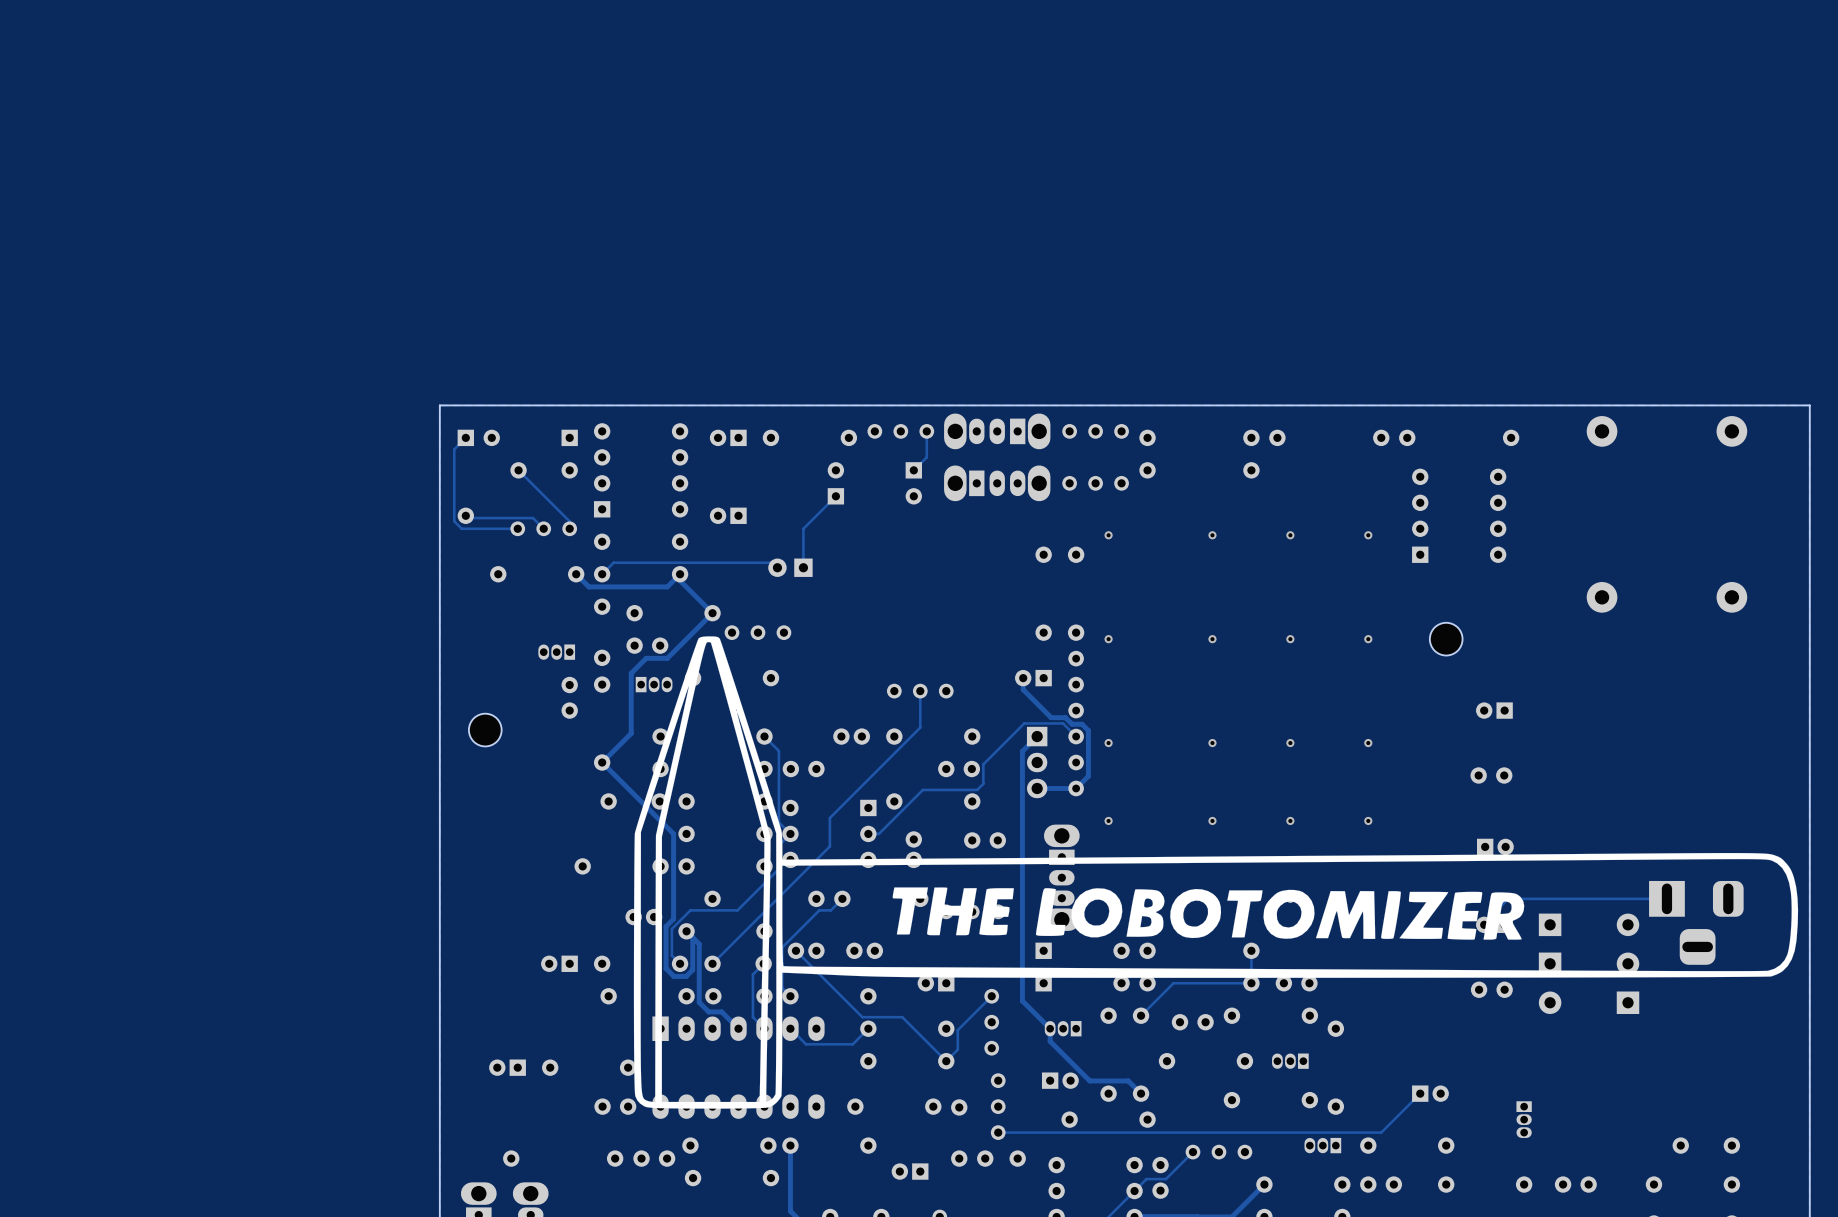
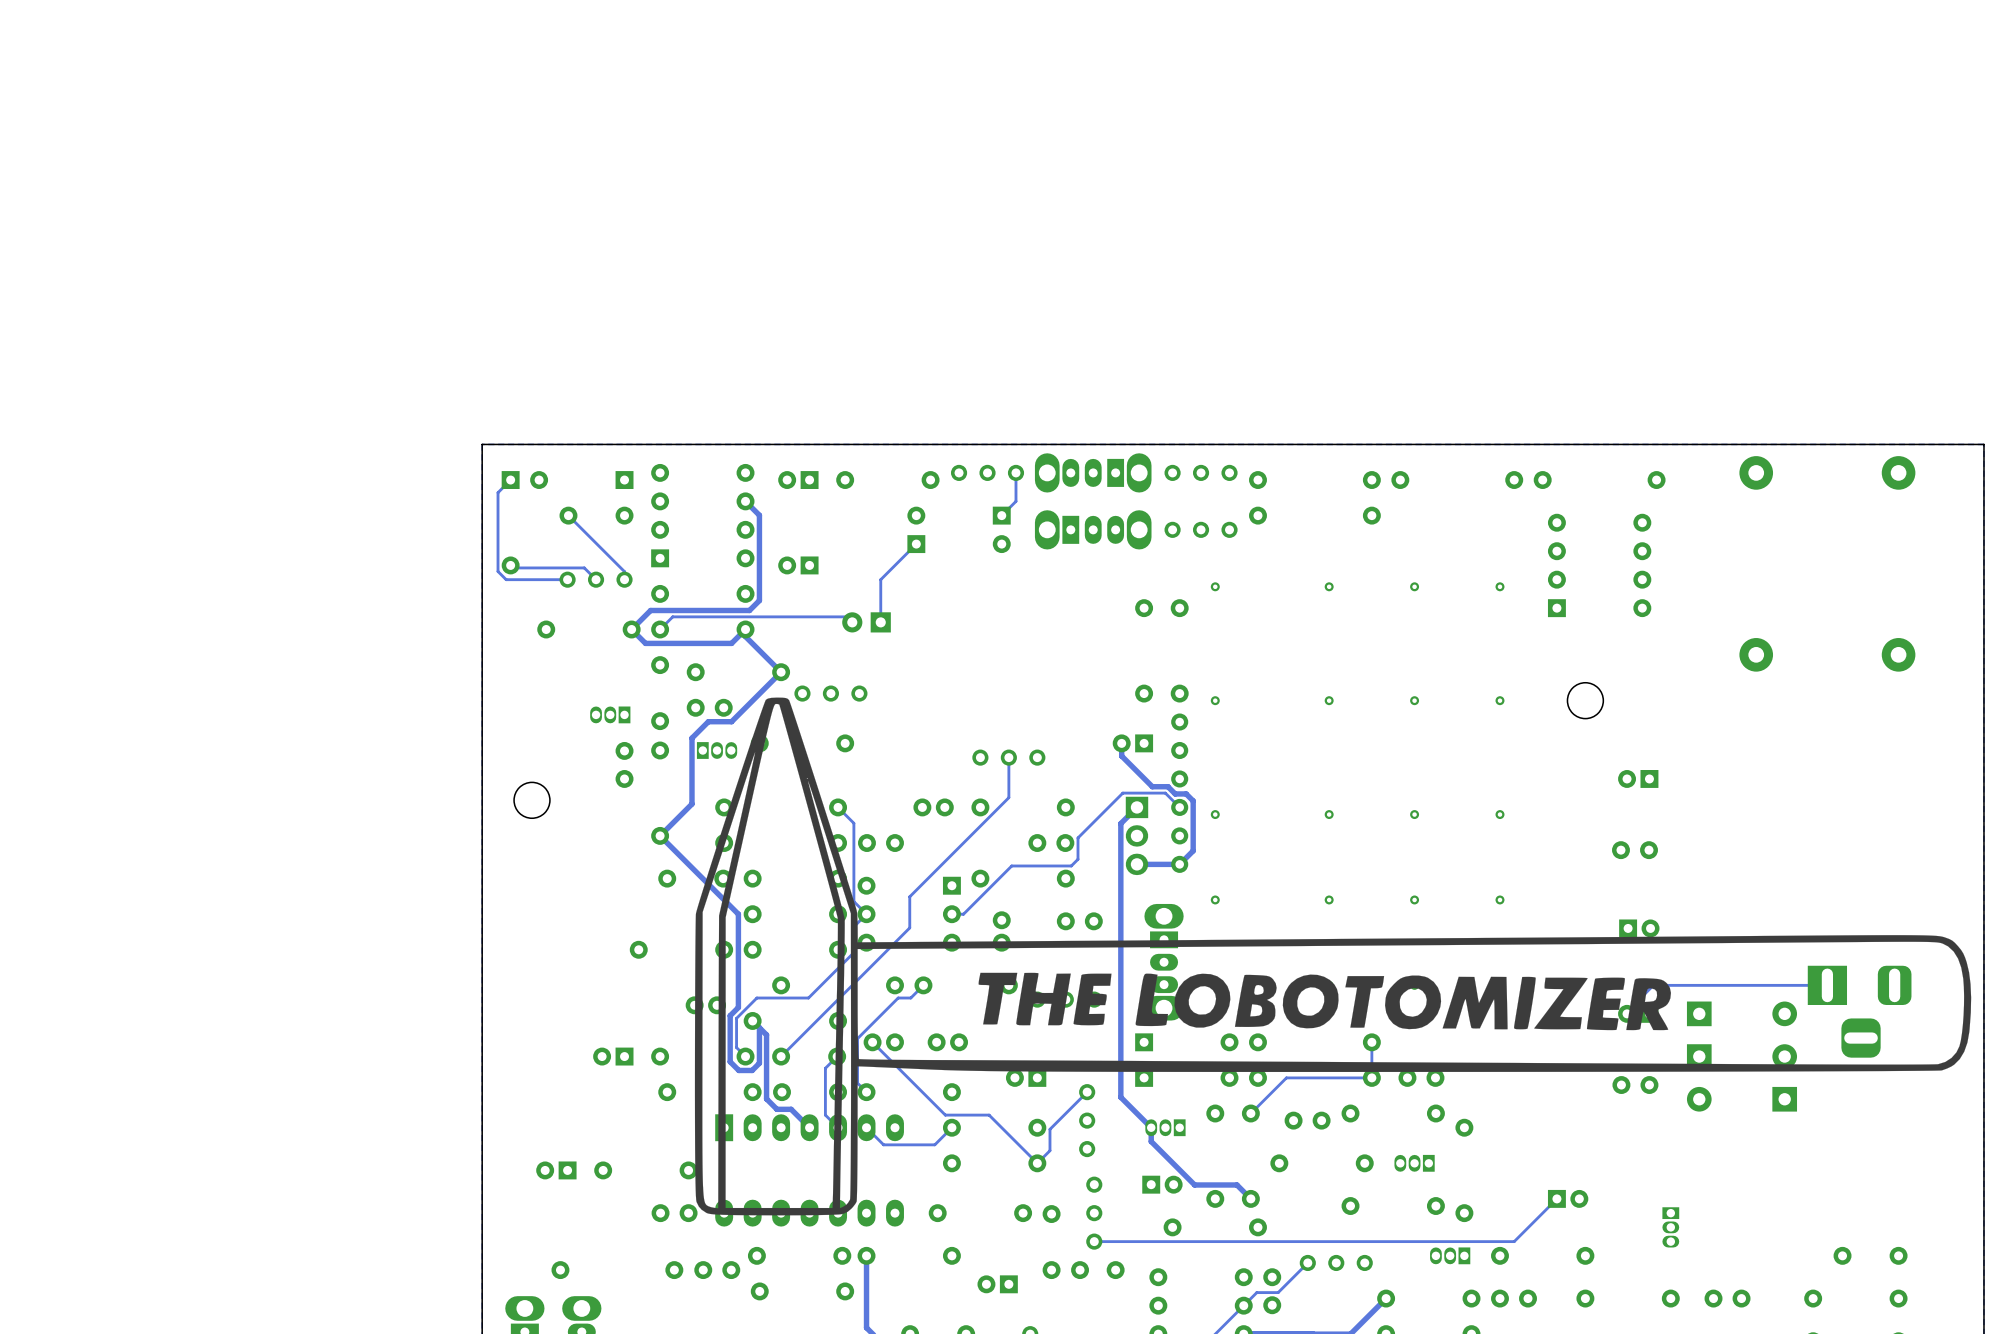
track: none -> (745, 501) (759, 515) (759, 600) (749, 610) (650, 610) (631, 629)

